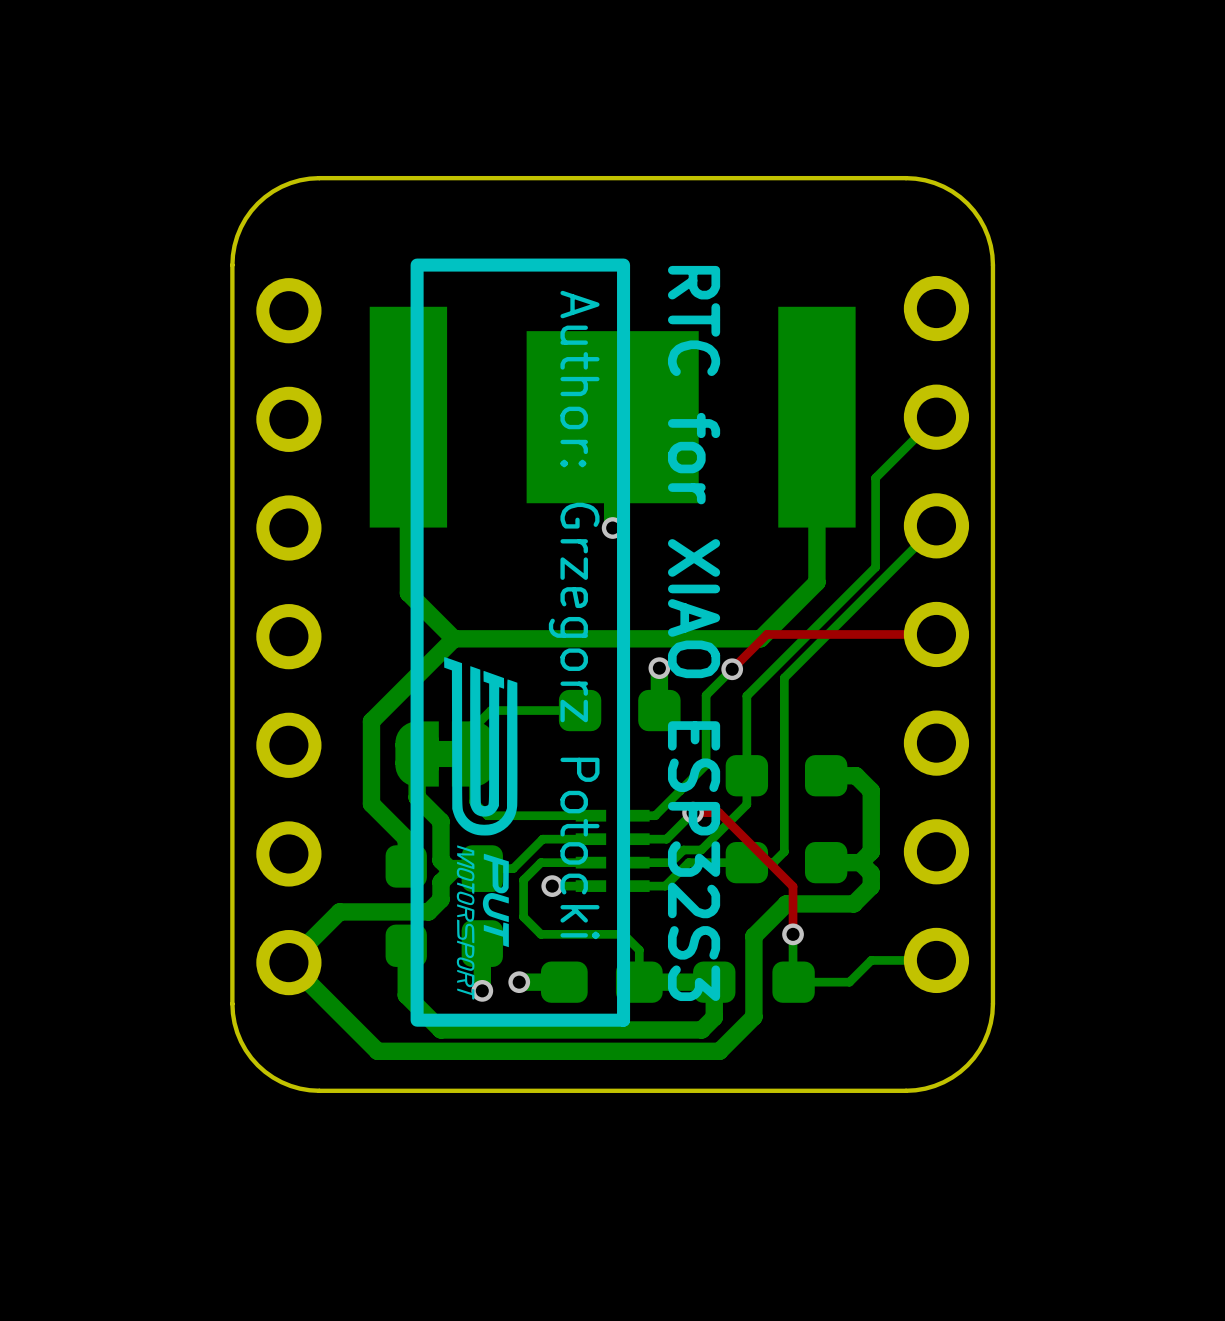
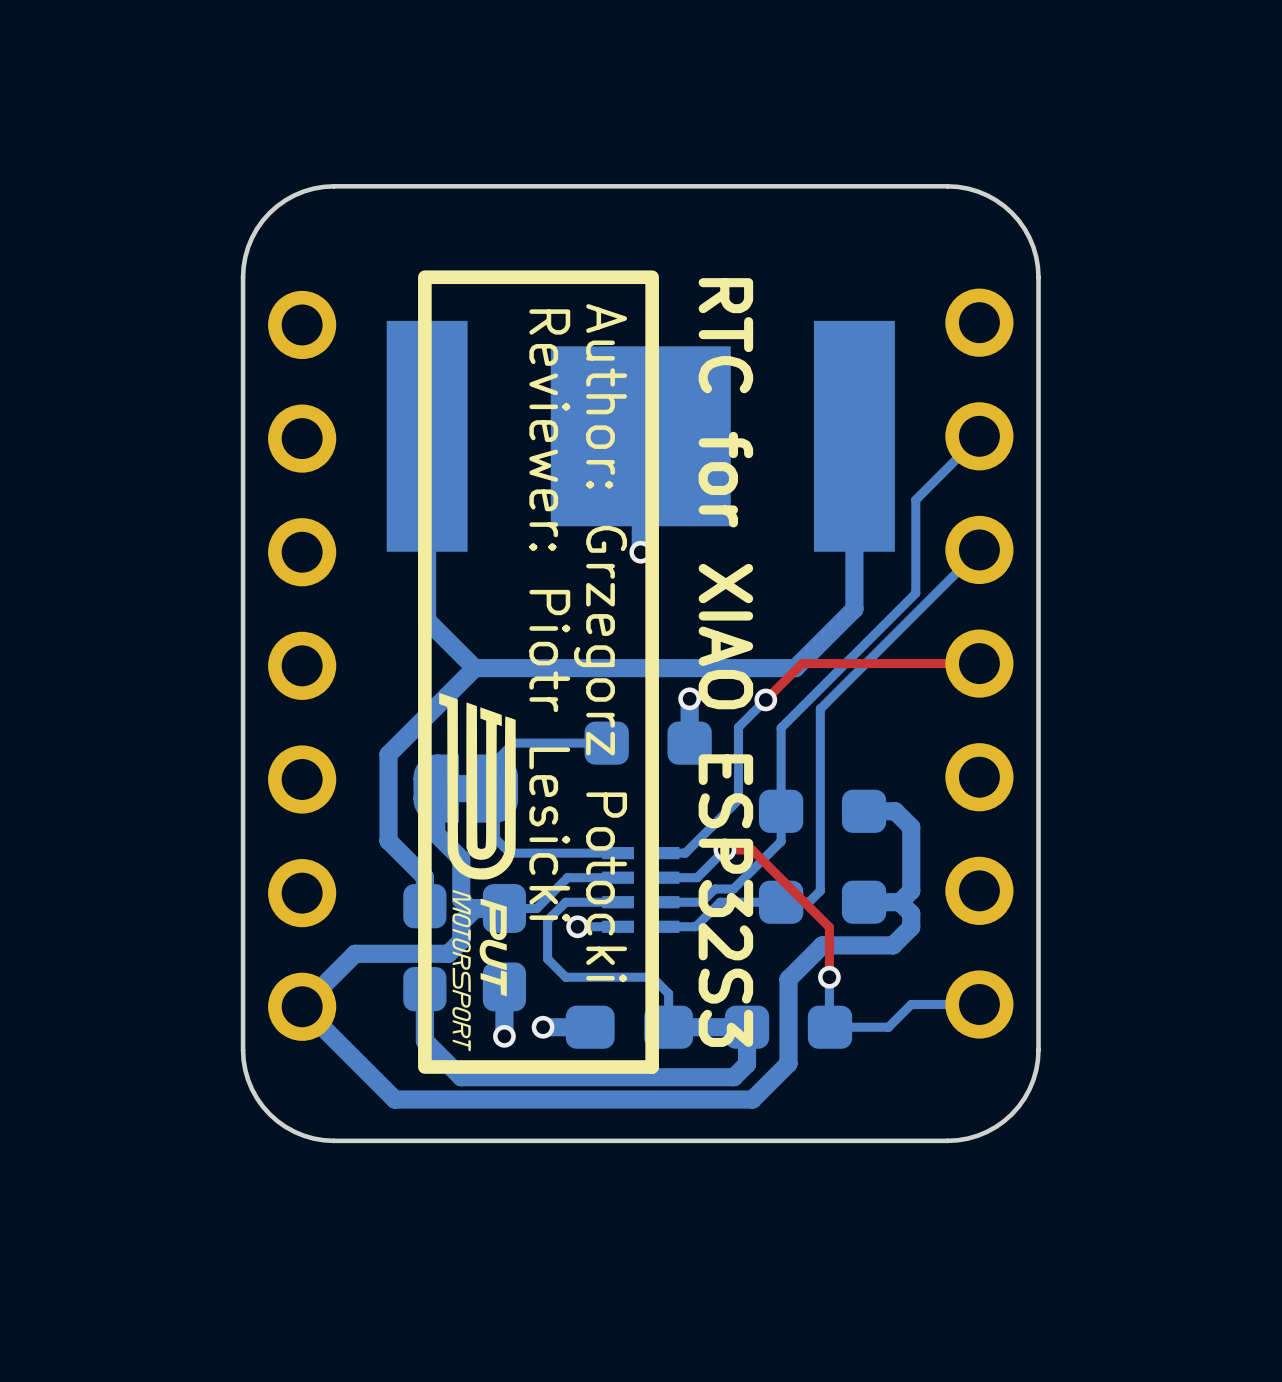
drawing shape: [410, 258, 631, 1027] -> [418, 270, 659, 1074]

